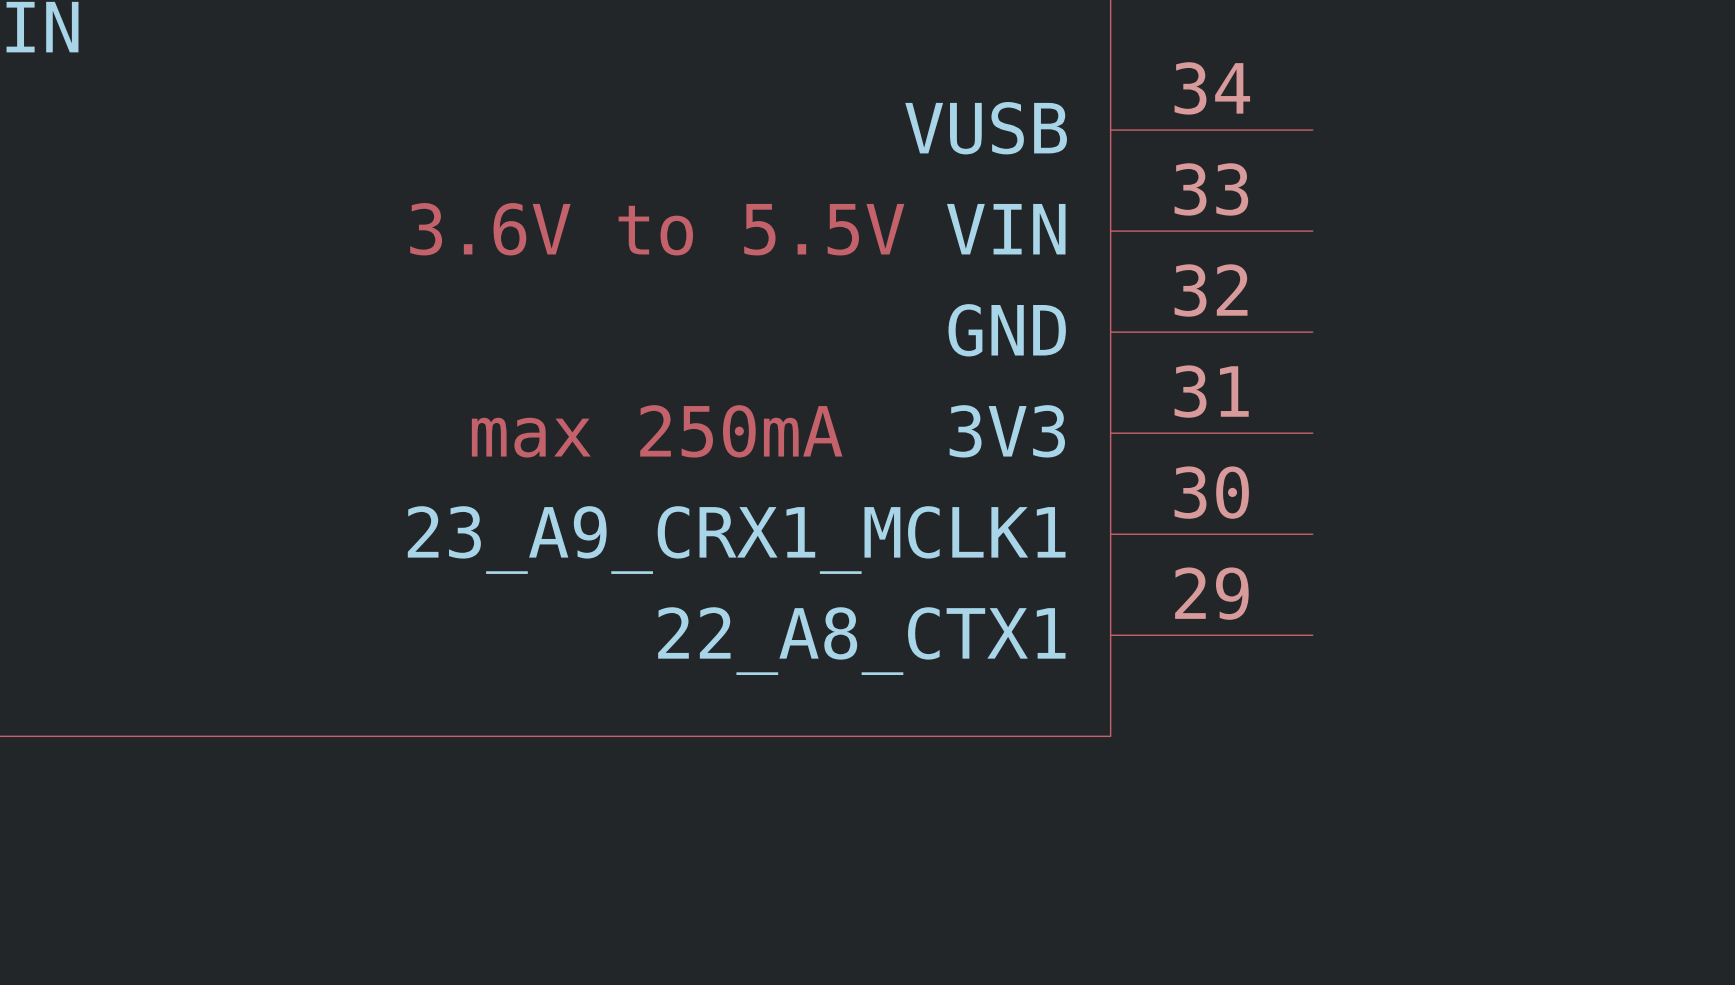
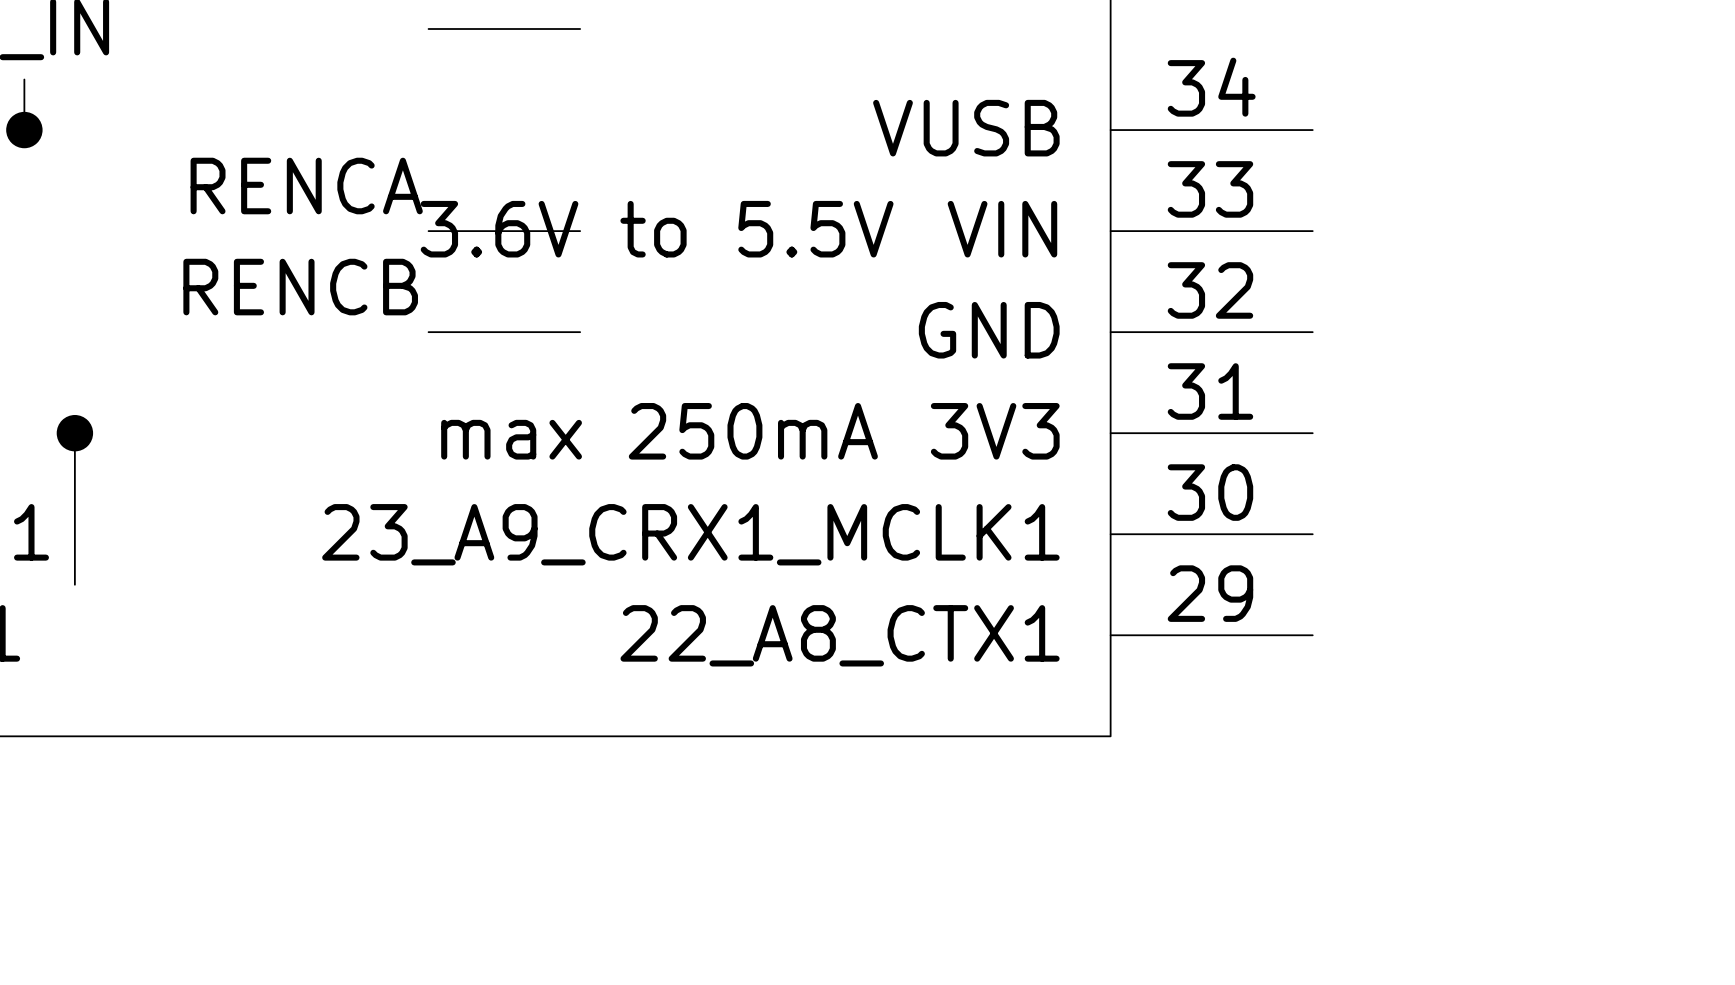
wire: none -> (428, 29) (580, 29)
wire: none -> (24, 79) (24, 130)
junction: none -> (24, 130)
label: none -> RENCA (306, 186)
wire: none -> (428, 231) (580, 231)
label: none -> RENCB (300, 287)
wire: none -> (428, 332) (580, 332)
wire: none -> (74, 433) (74, 584)
junction: none -> (74, 433)

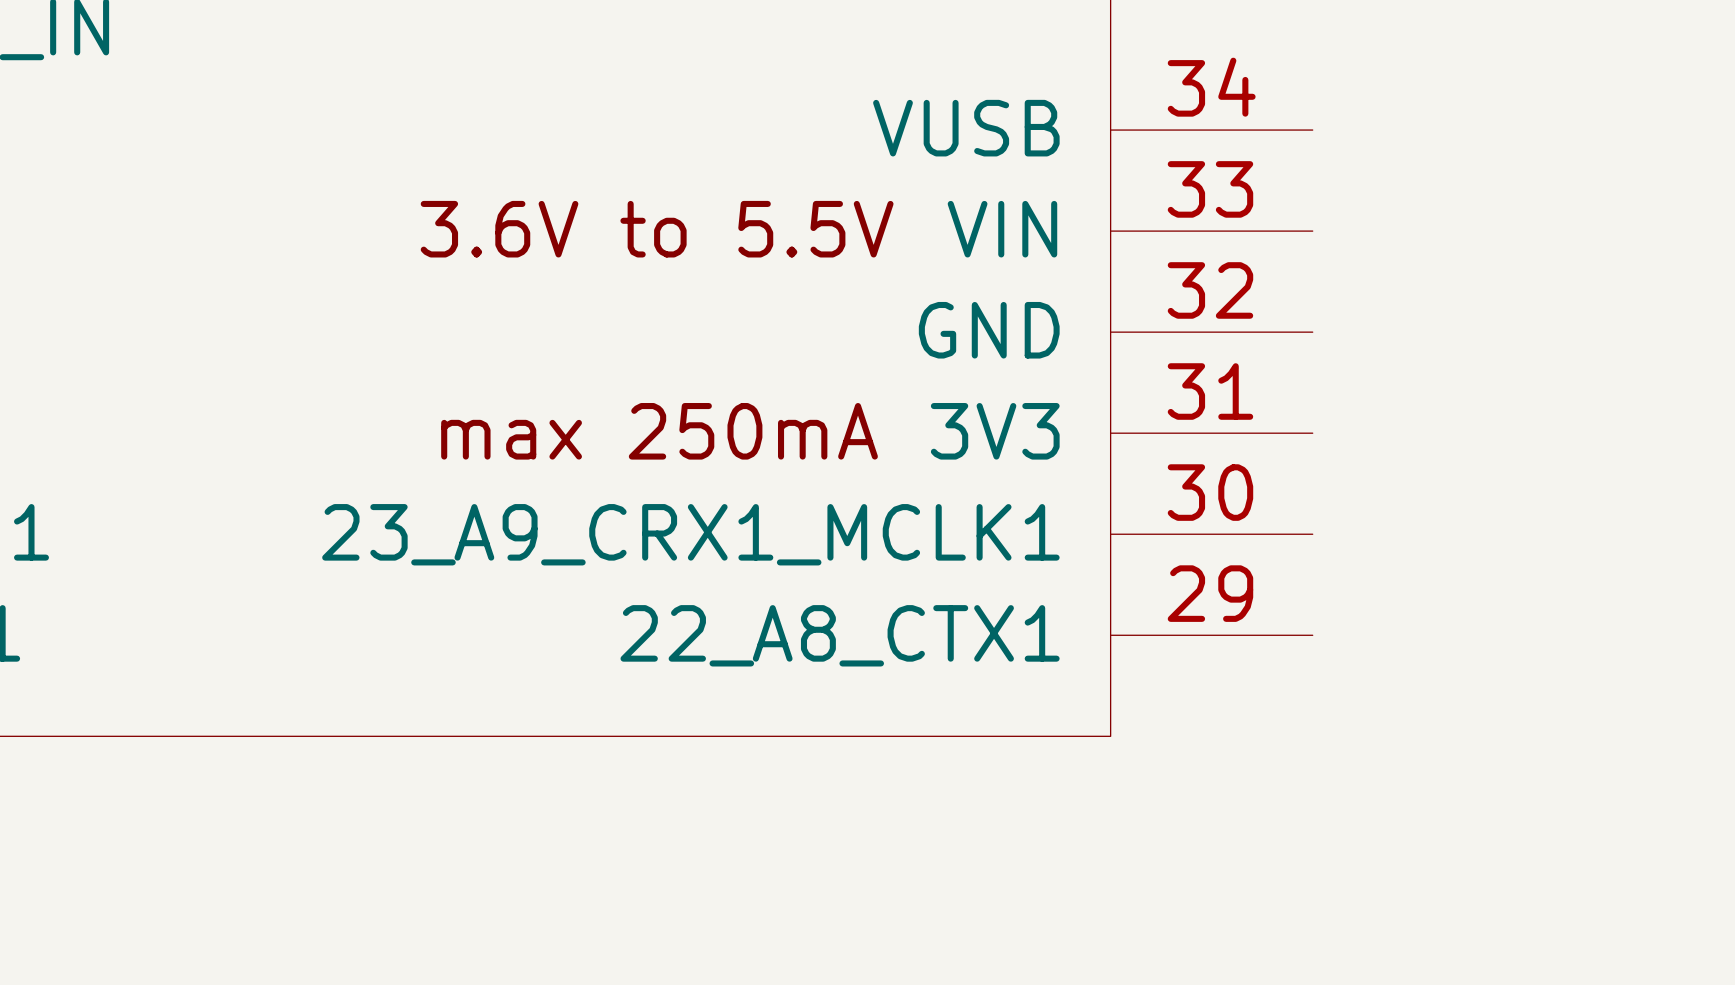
wire: (428, 29) (580, 29) -> none
wire: (24, 79) (24, 130) -> none
junction: (24, 130) -> none
label: RENCA (306, 186) -> none
wire: (428, 231) (580, 231) -> none
label: RENCB (300, 287) -> none
wire: (428, 332) (580, 332) -> none
wire: (74, 433) (74, 584) -> none
junction: (74, 433) -> none

